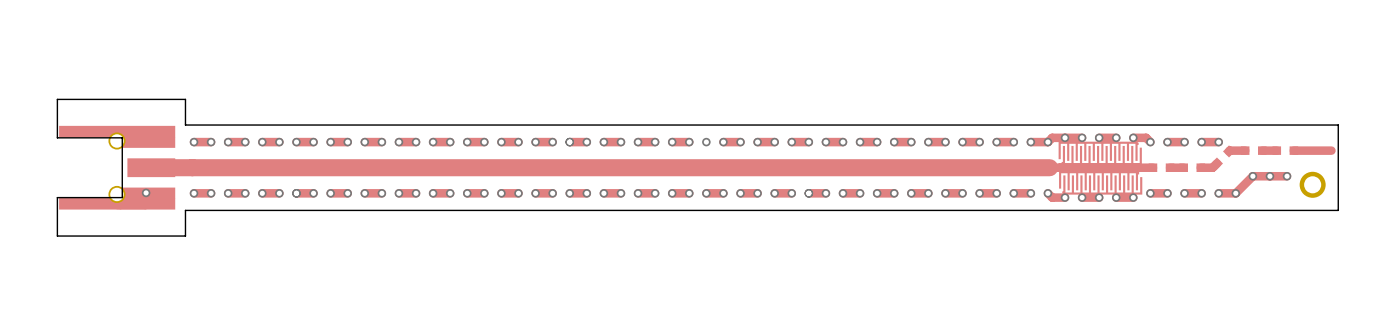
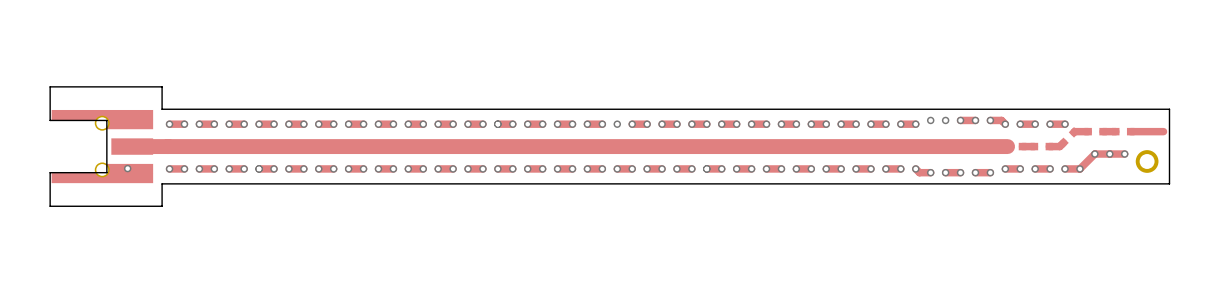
track: (1082, 137) (1052, 137) (1047, 142) -> none
part: (1100, 153) -> none
track width: thin (1049, 167) (1152, 167) -> thick (917, 146) (1006, 146)
part: (1100, 182) -> none

